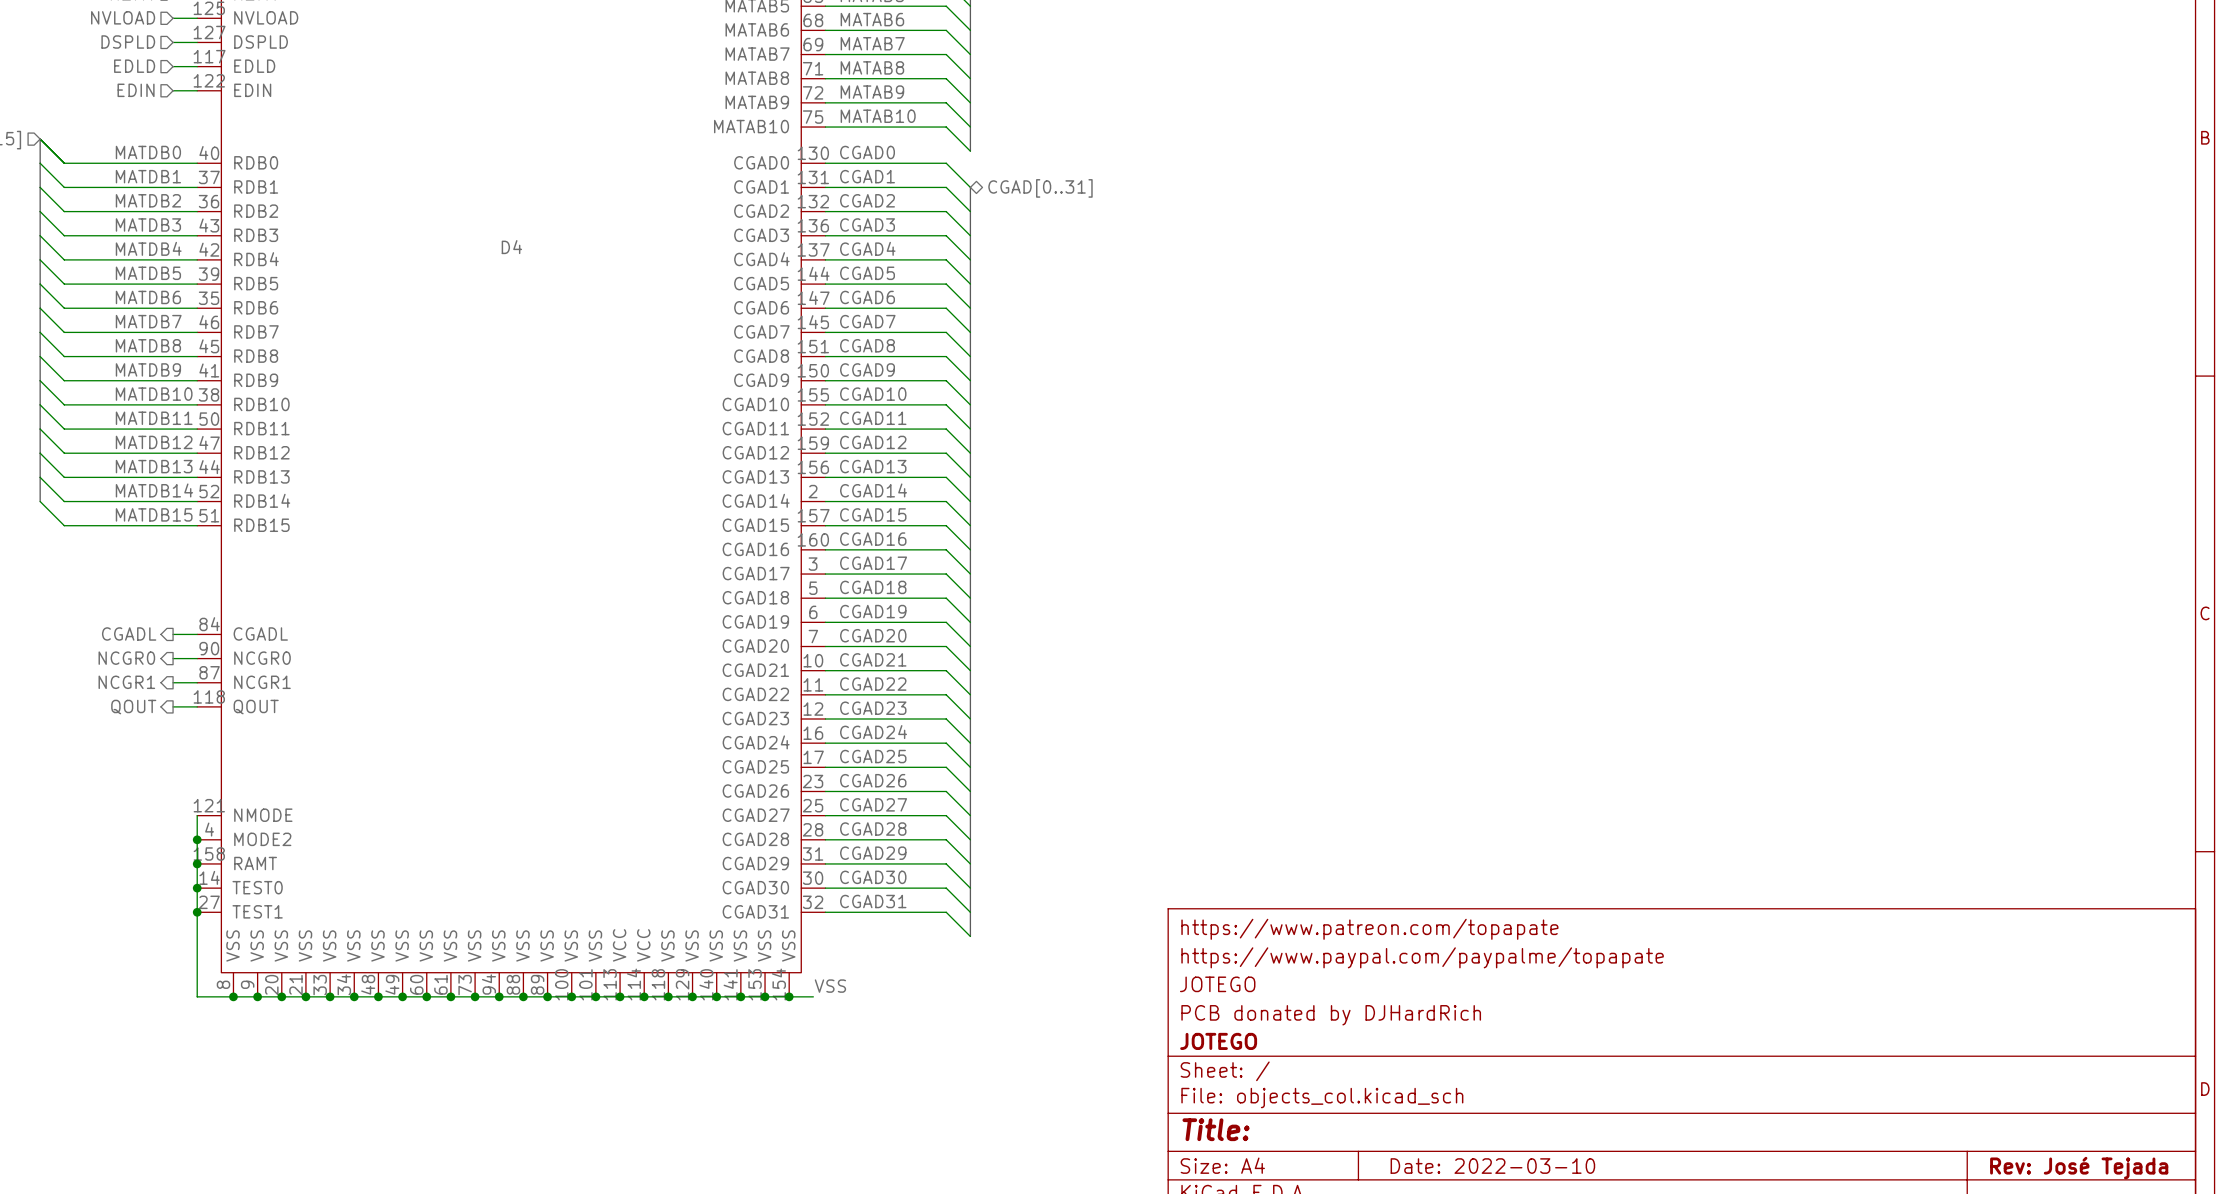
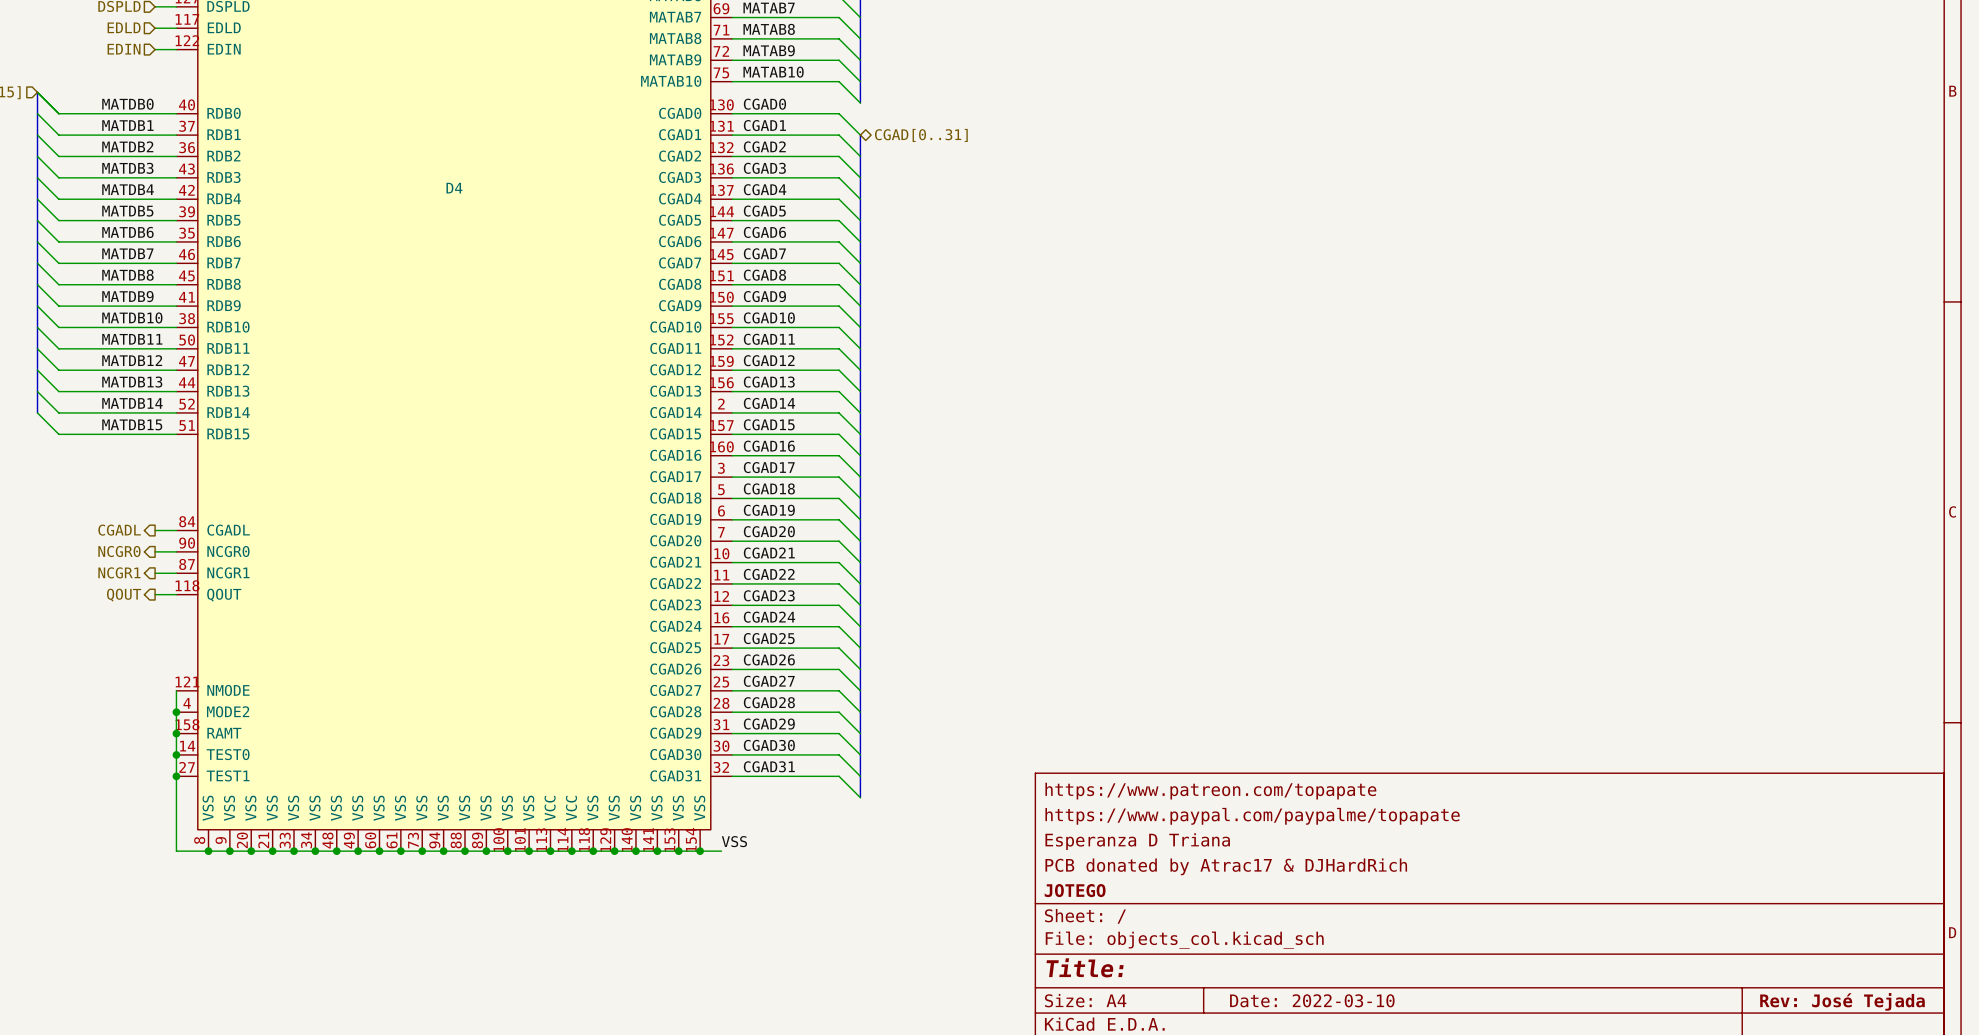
title block: JOTEGO (1217, 984) -> Esperanza D Triana (1137, 841)
title block: PCB donated by DJHardRich (1331, 1015) -> PCB donated by Atrac17 & DJHardRich (1226, 866)

